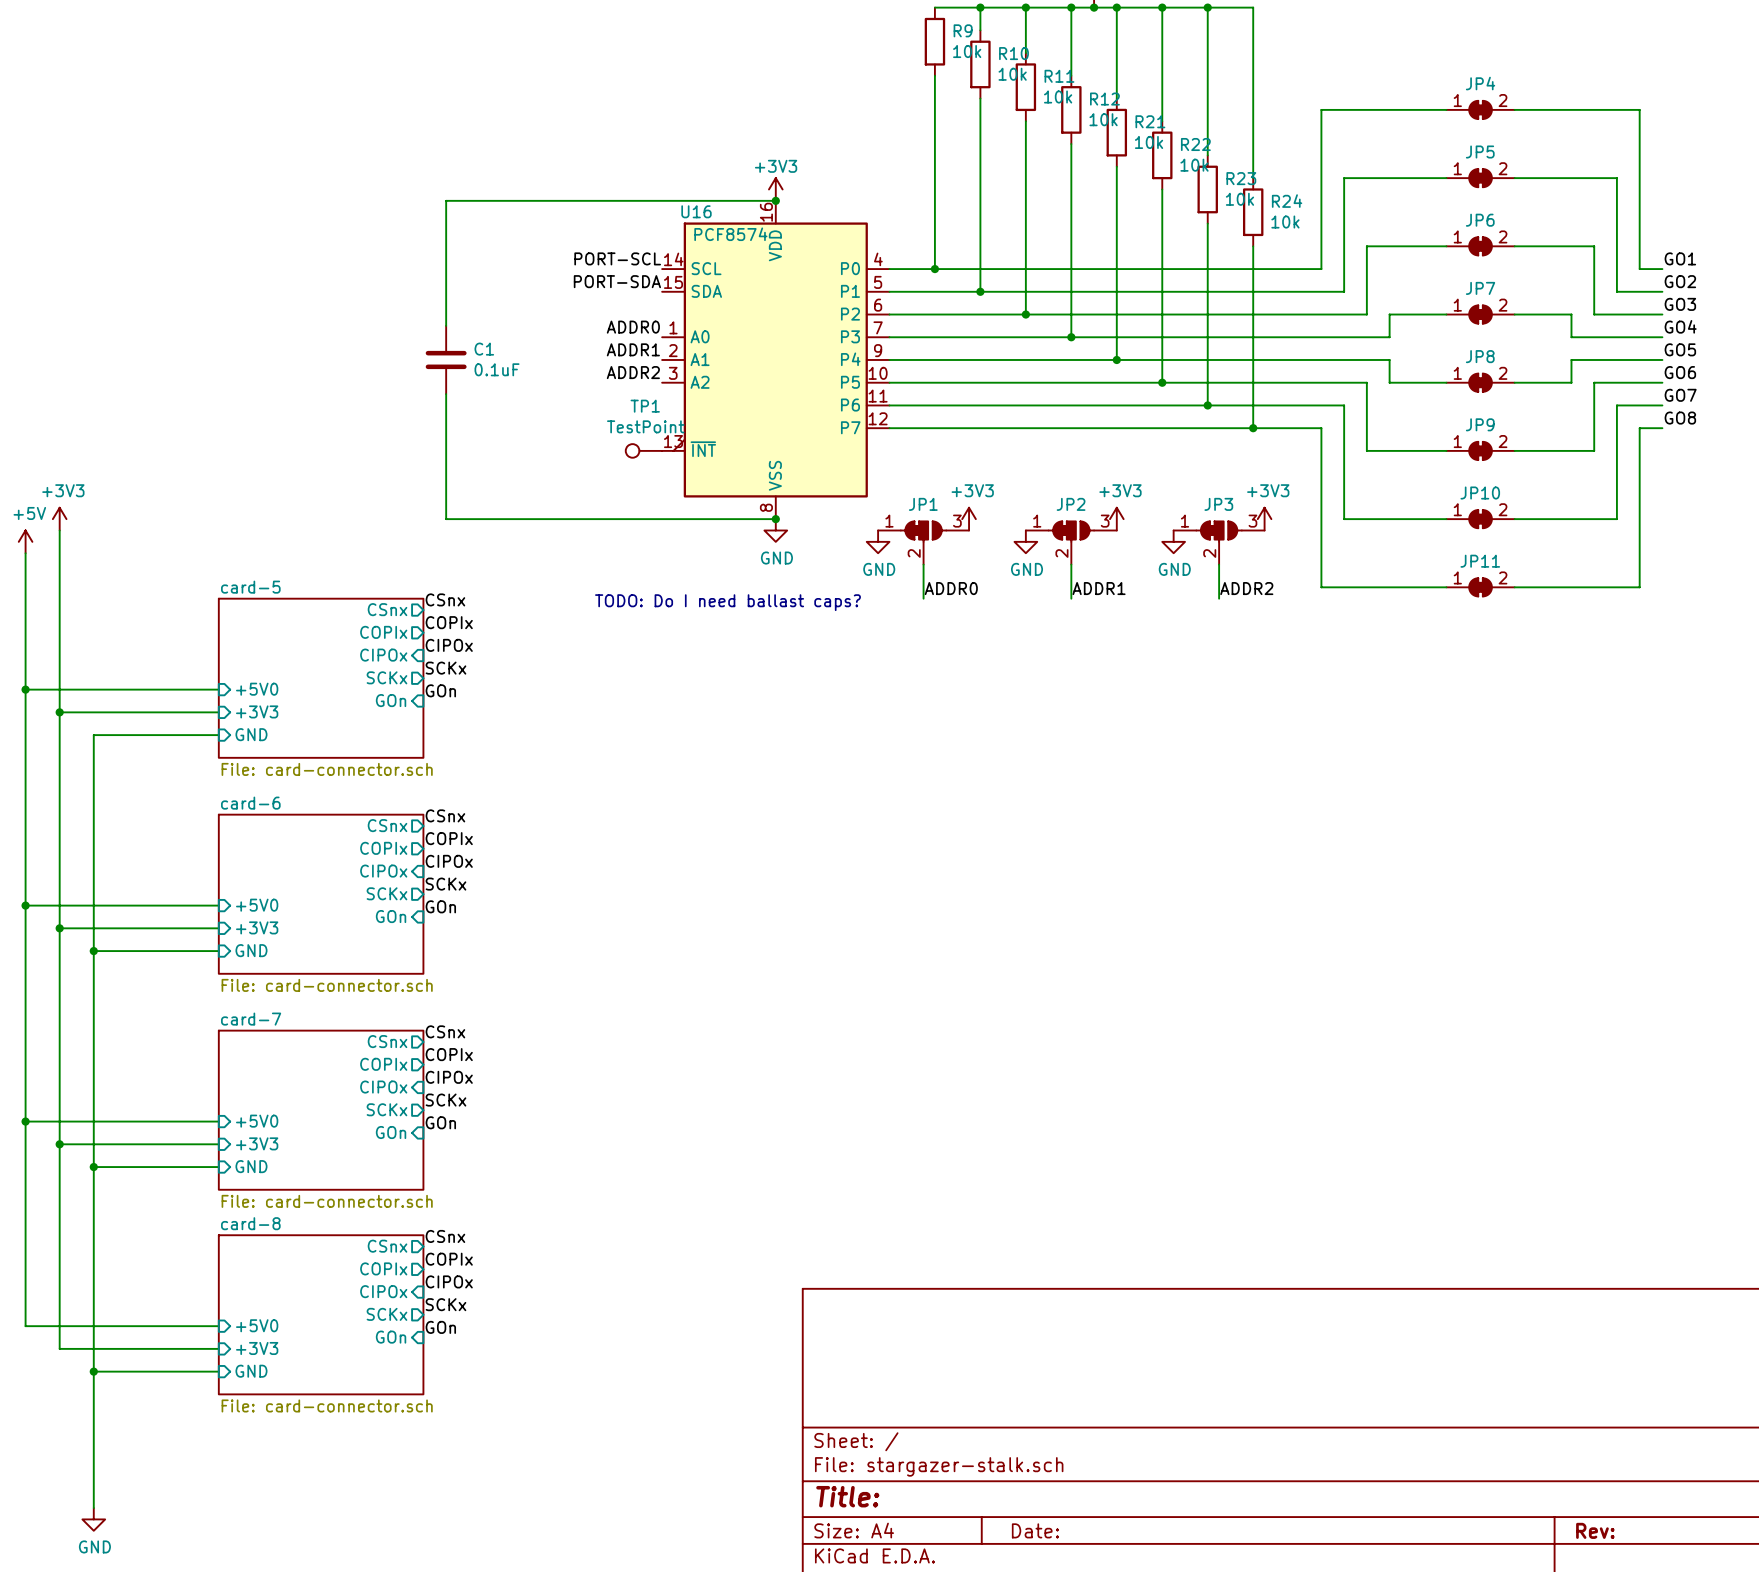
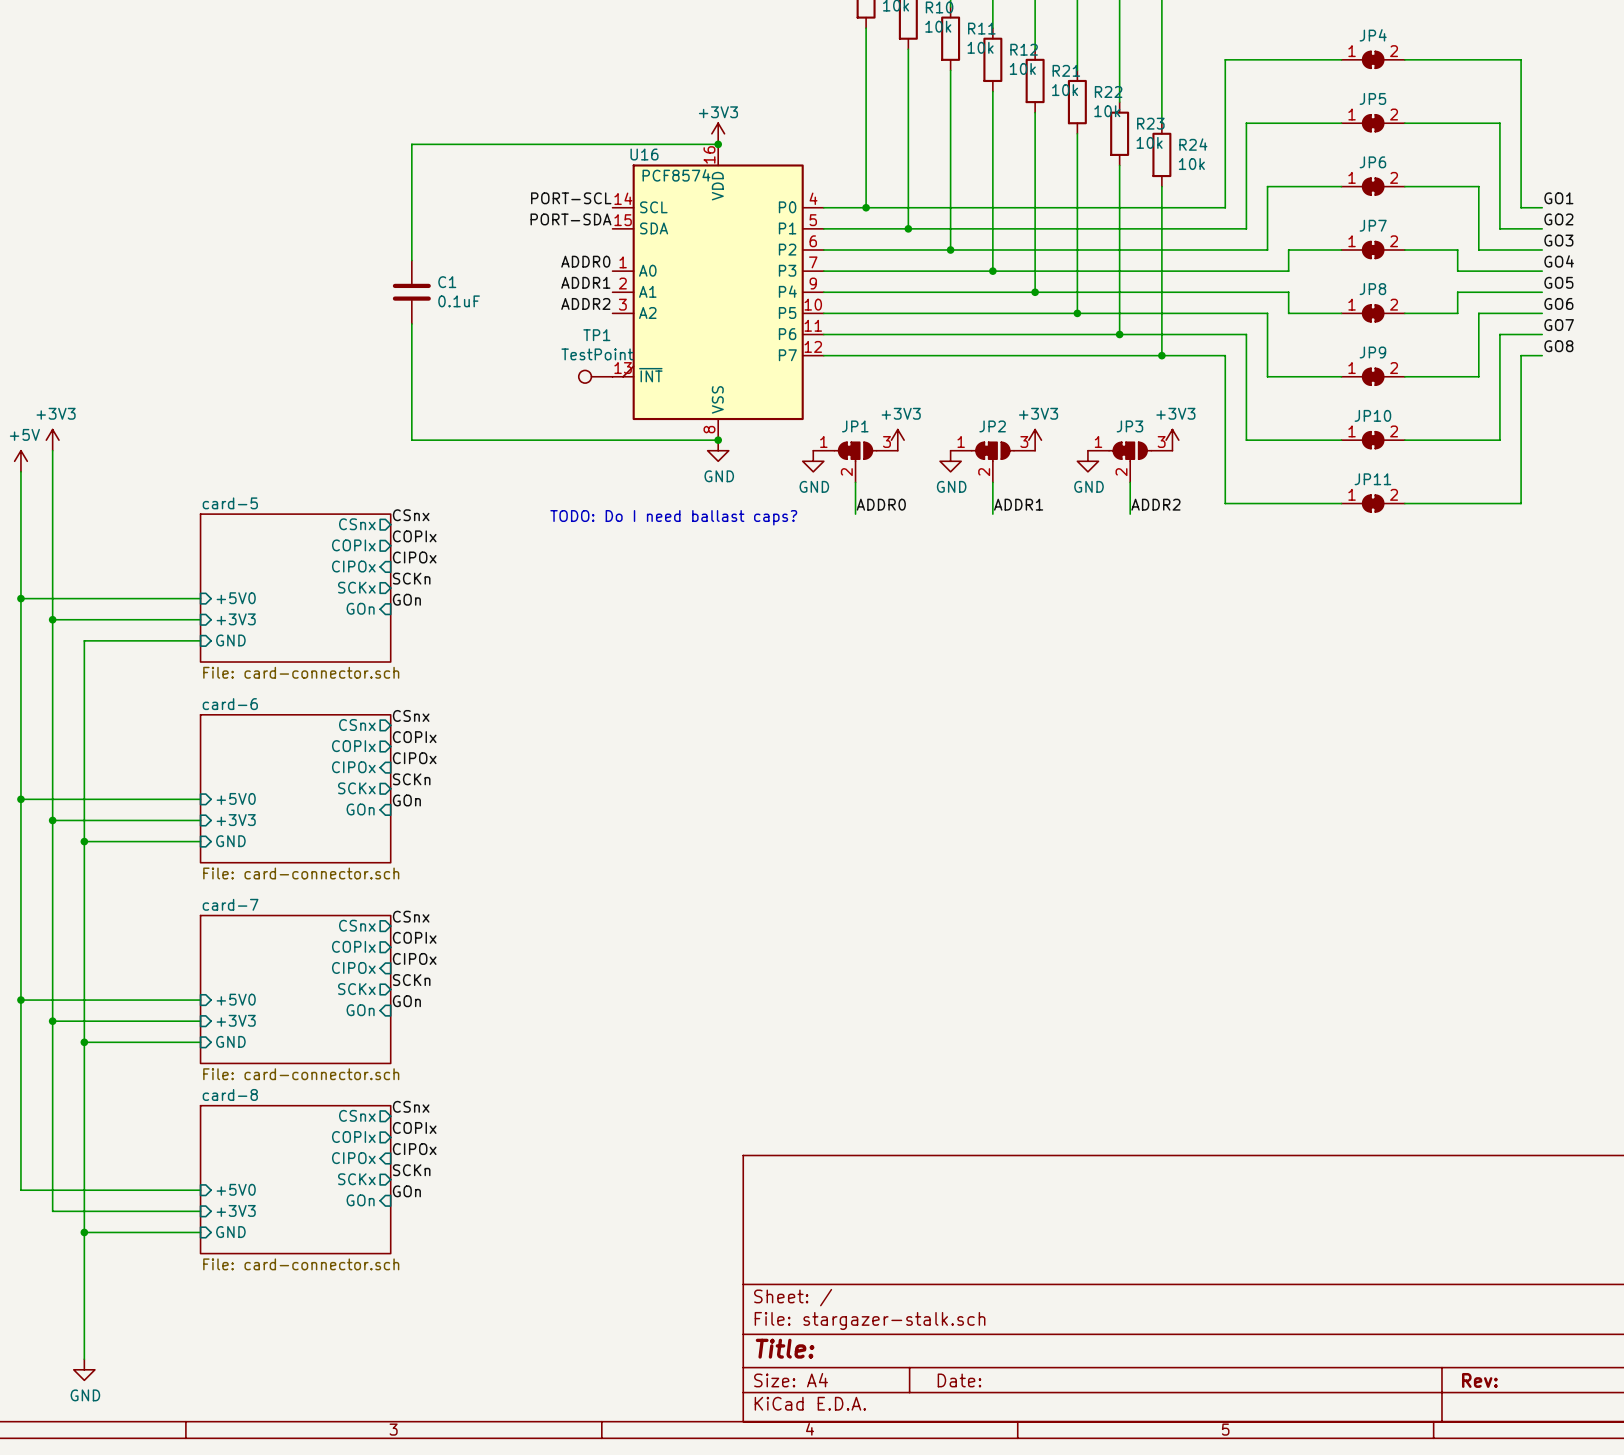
label: SCKx (445, 668) -> SCKn (411, 578)
label: SCKx (445, 884) -> SCKn (411, 779)
label: SCKx (445, 1100) -> SCKn (411, 980)
label: SCKx (445, 1304) -> SCKn (411, 1170)

